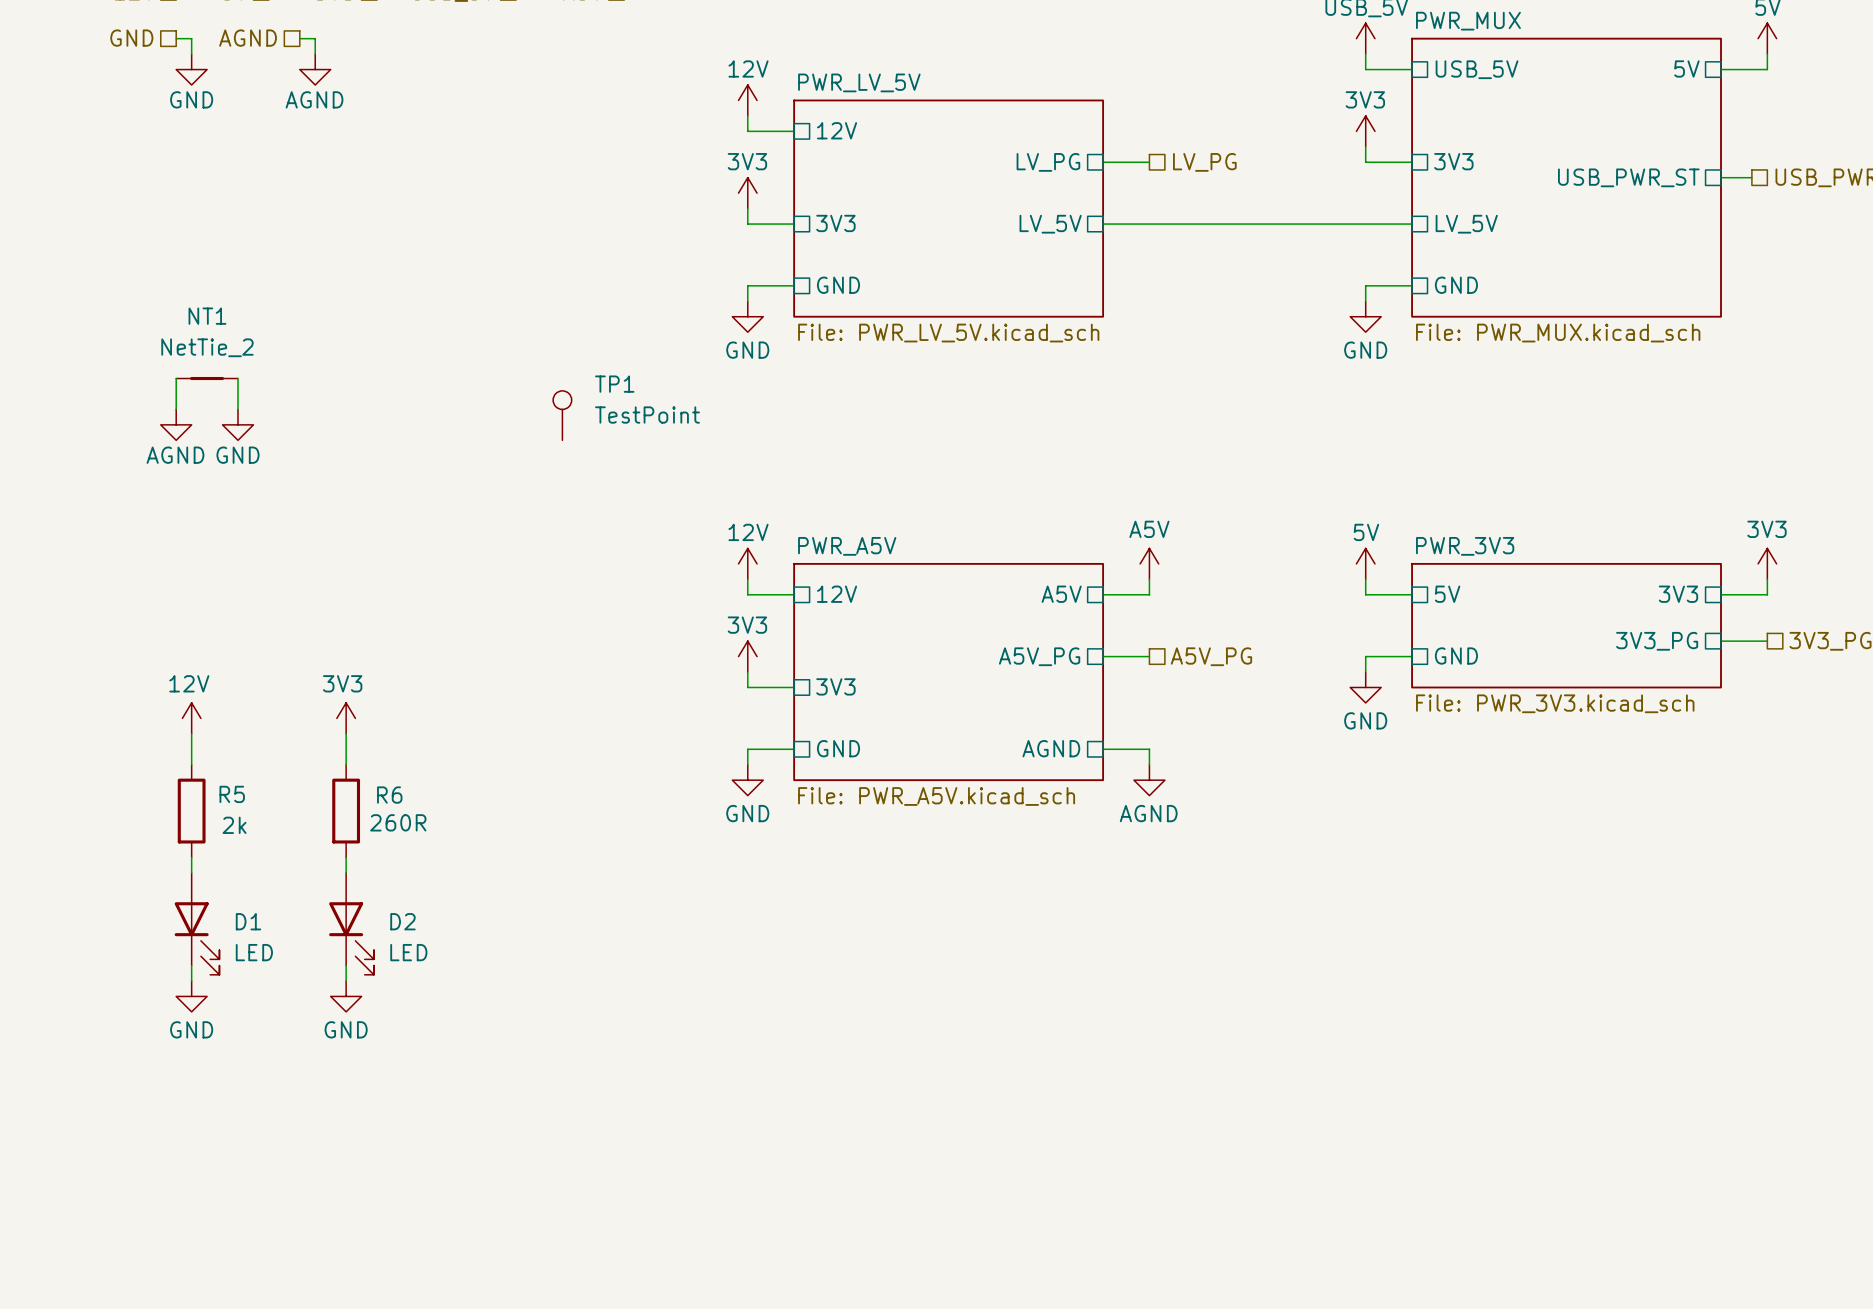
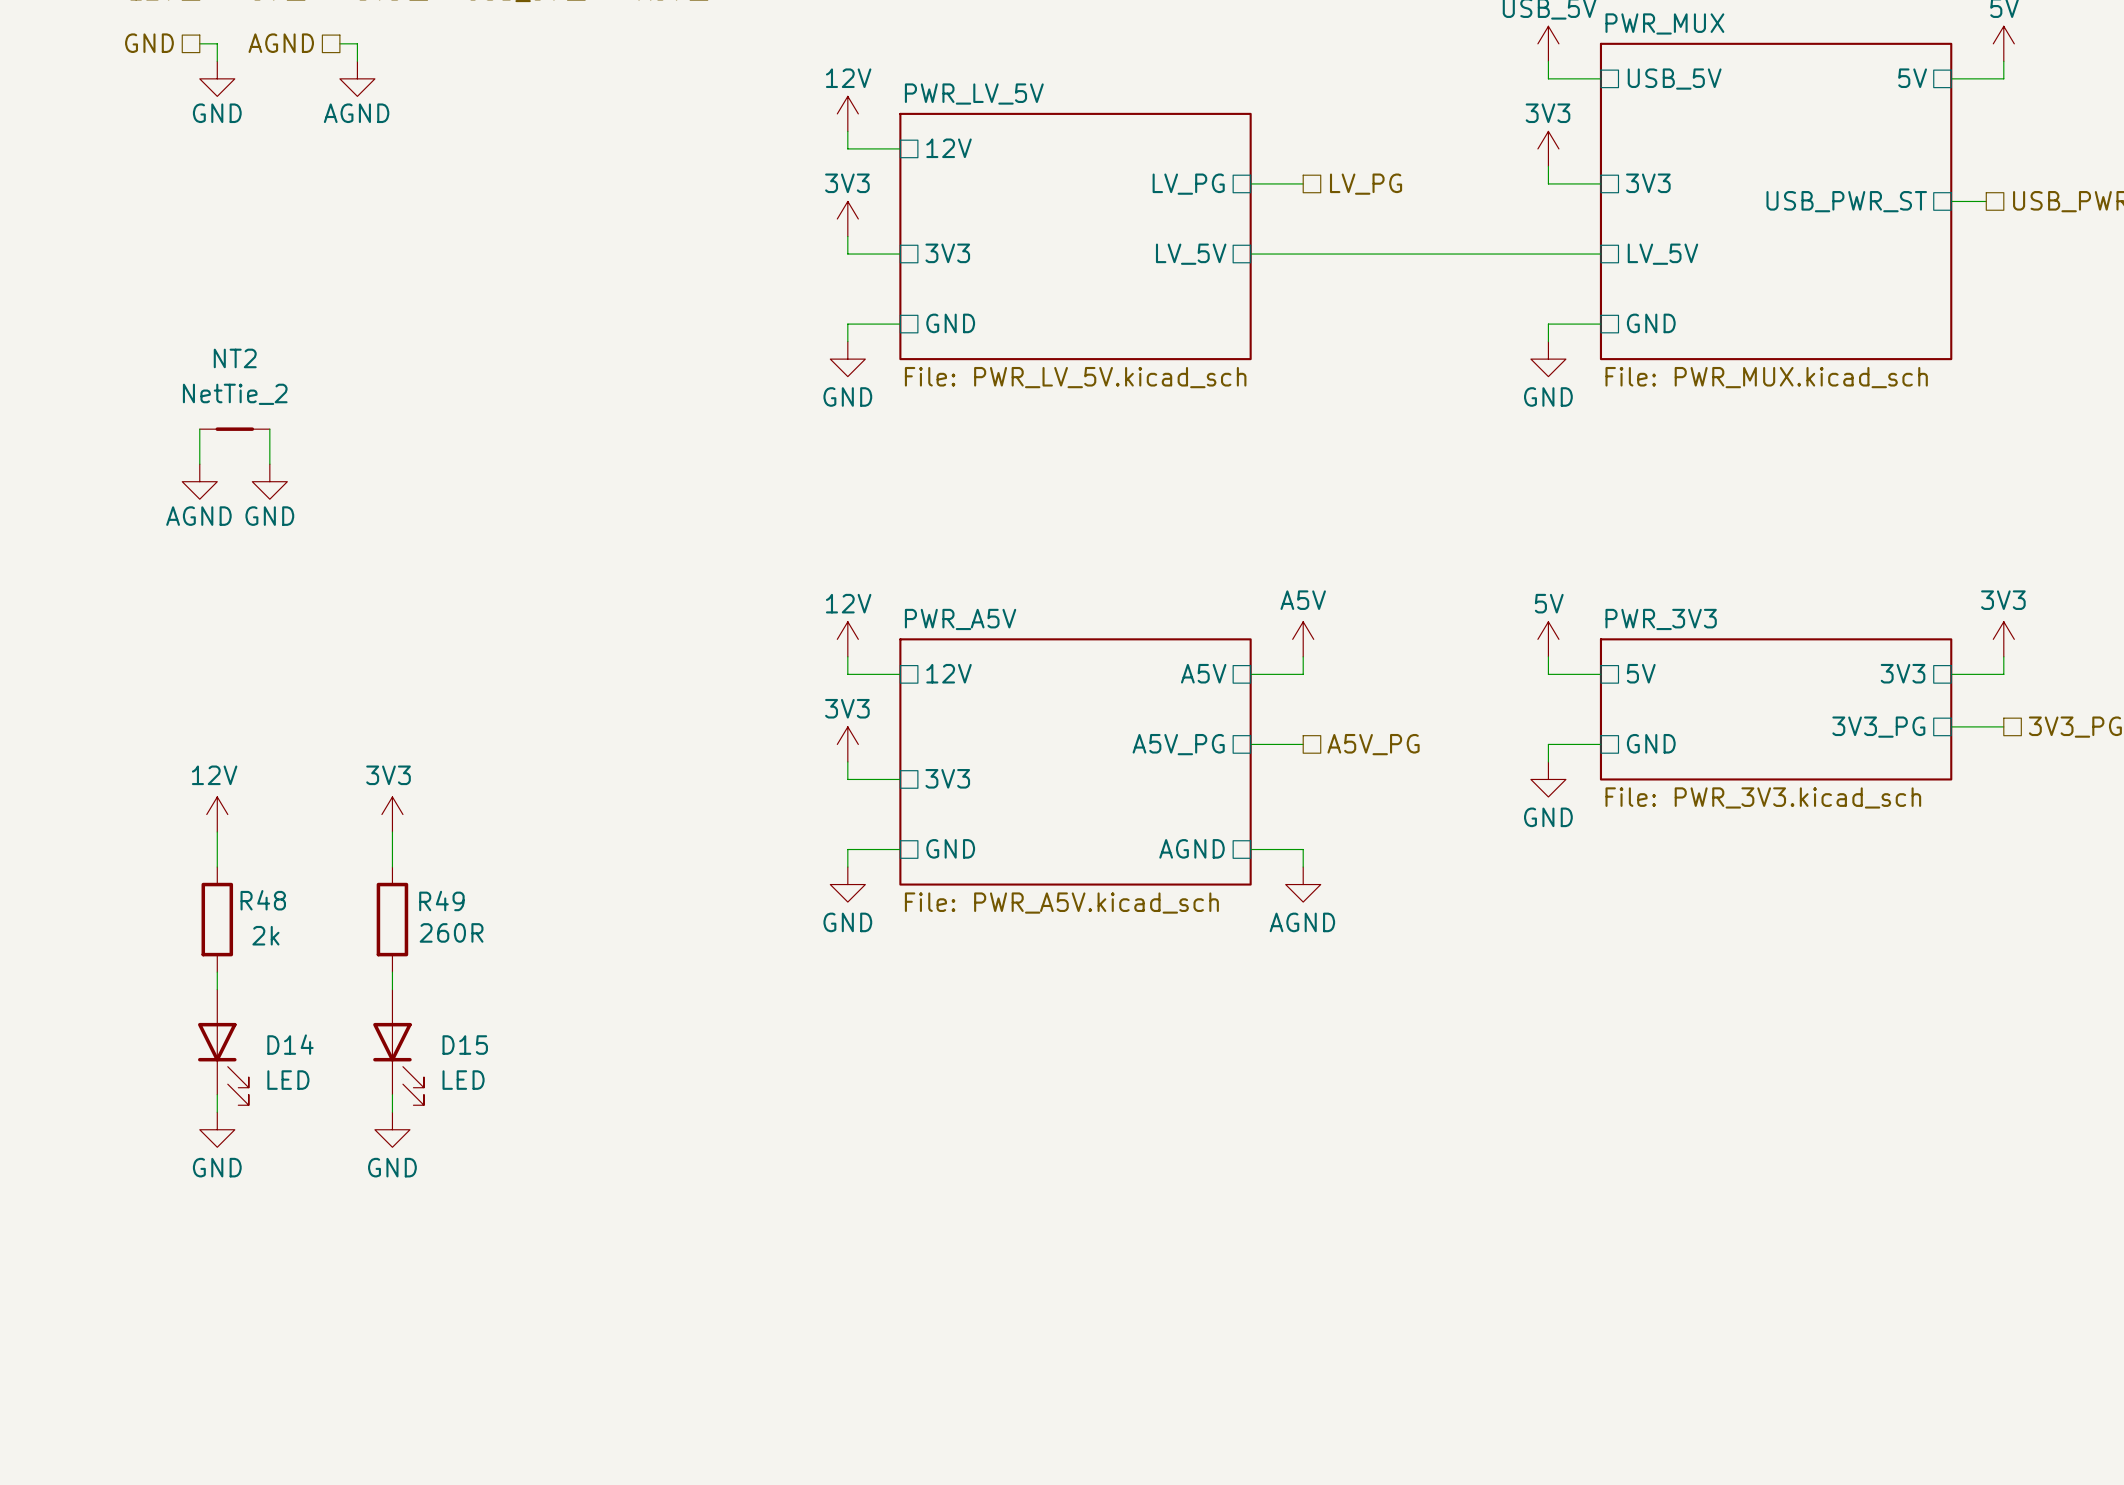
NT1 name: NT1 (207, 316) -> NT2 (235, 358)
TP1: TestPoint (562, 415) -> none
R5 name: R5 (232, 794) -> R48 (263, 900)
R6 name: R6 (389, 795) -> R49 (441, 900)
D1 name: D1 (248, 921) -> D14 (290, 1044)
D2 name: D2 (402, 921) -> D15 (465, 1045)

